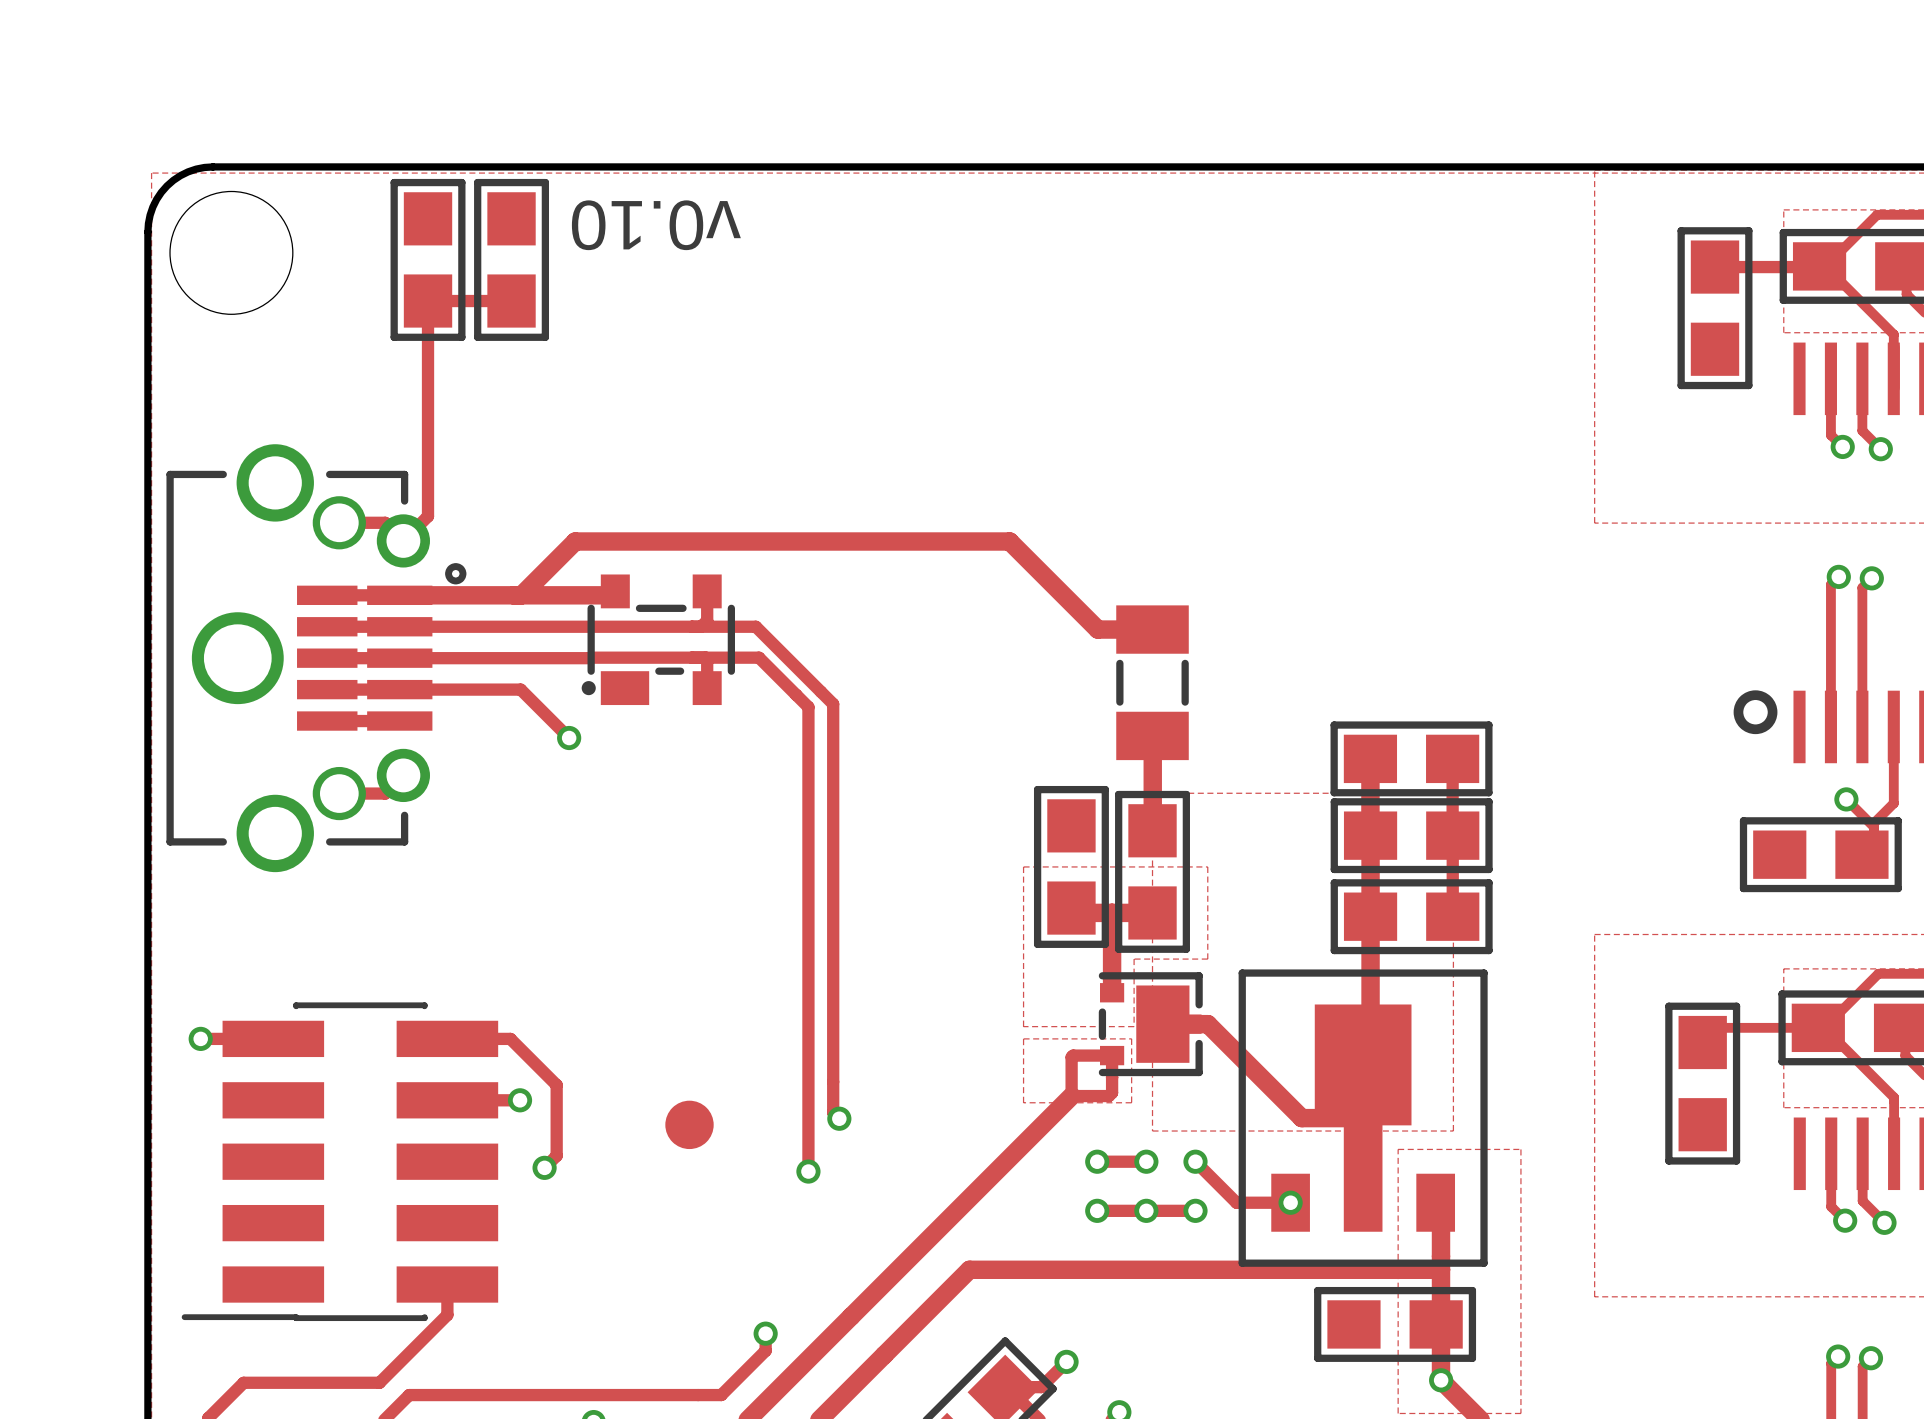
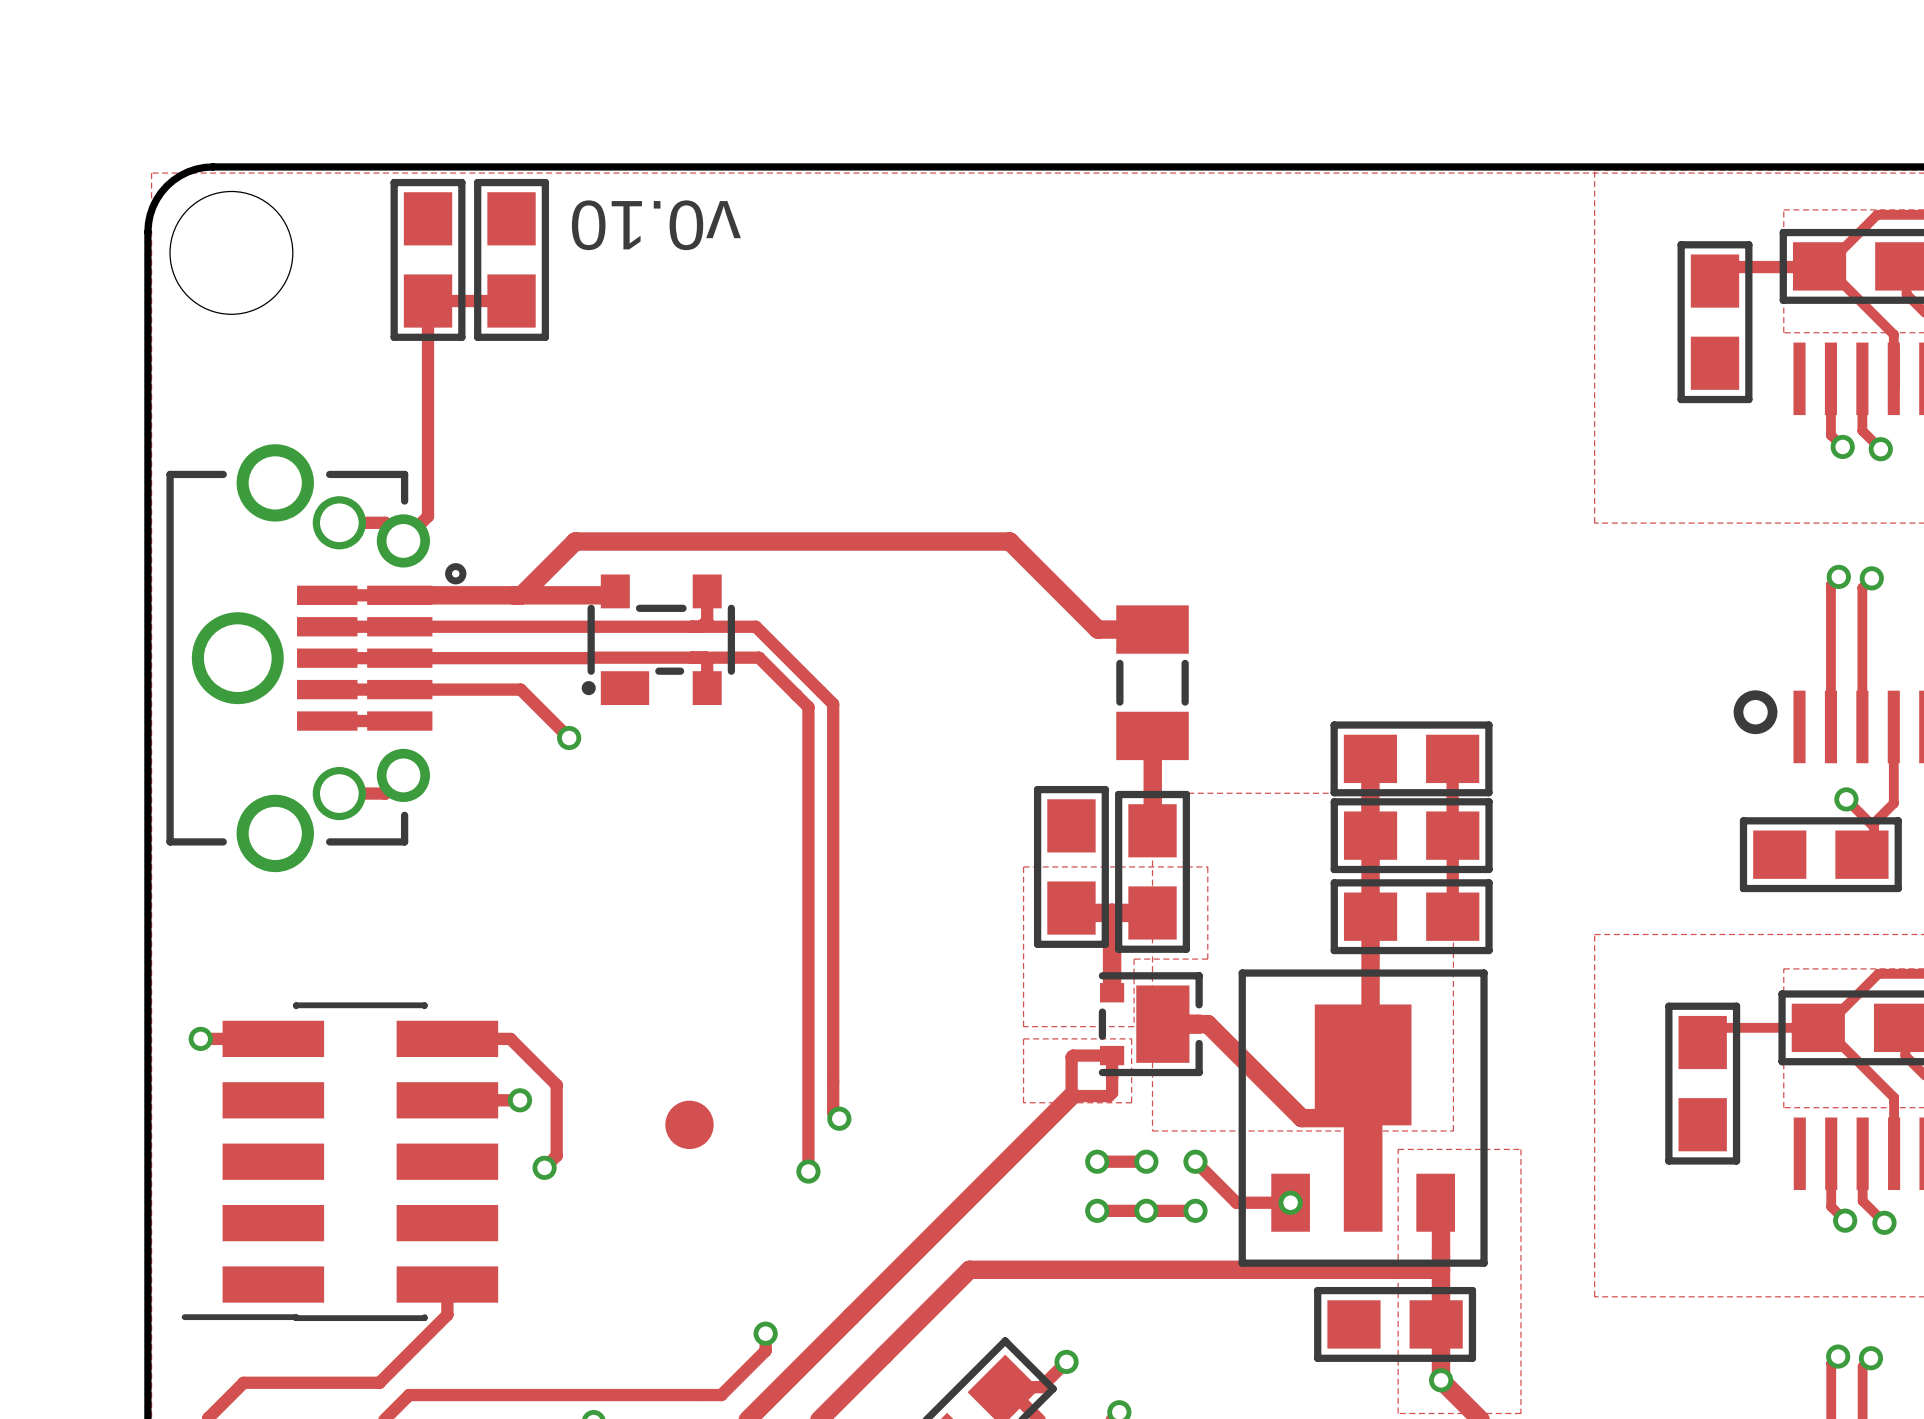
part position: (1714, 308) -> (1714, 322)

